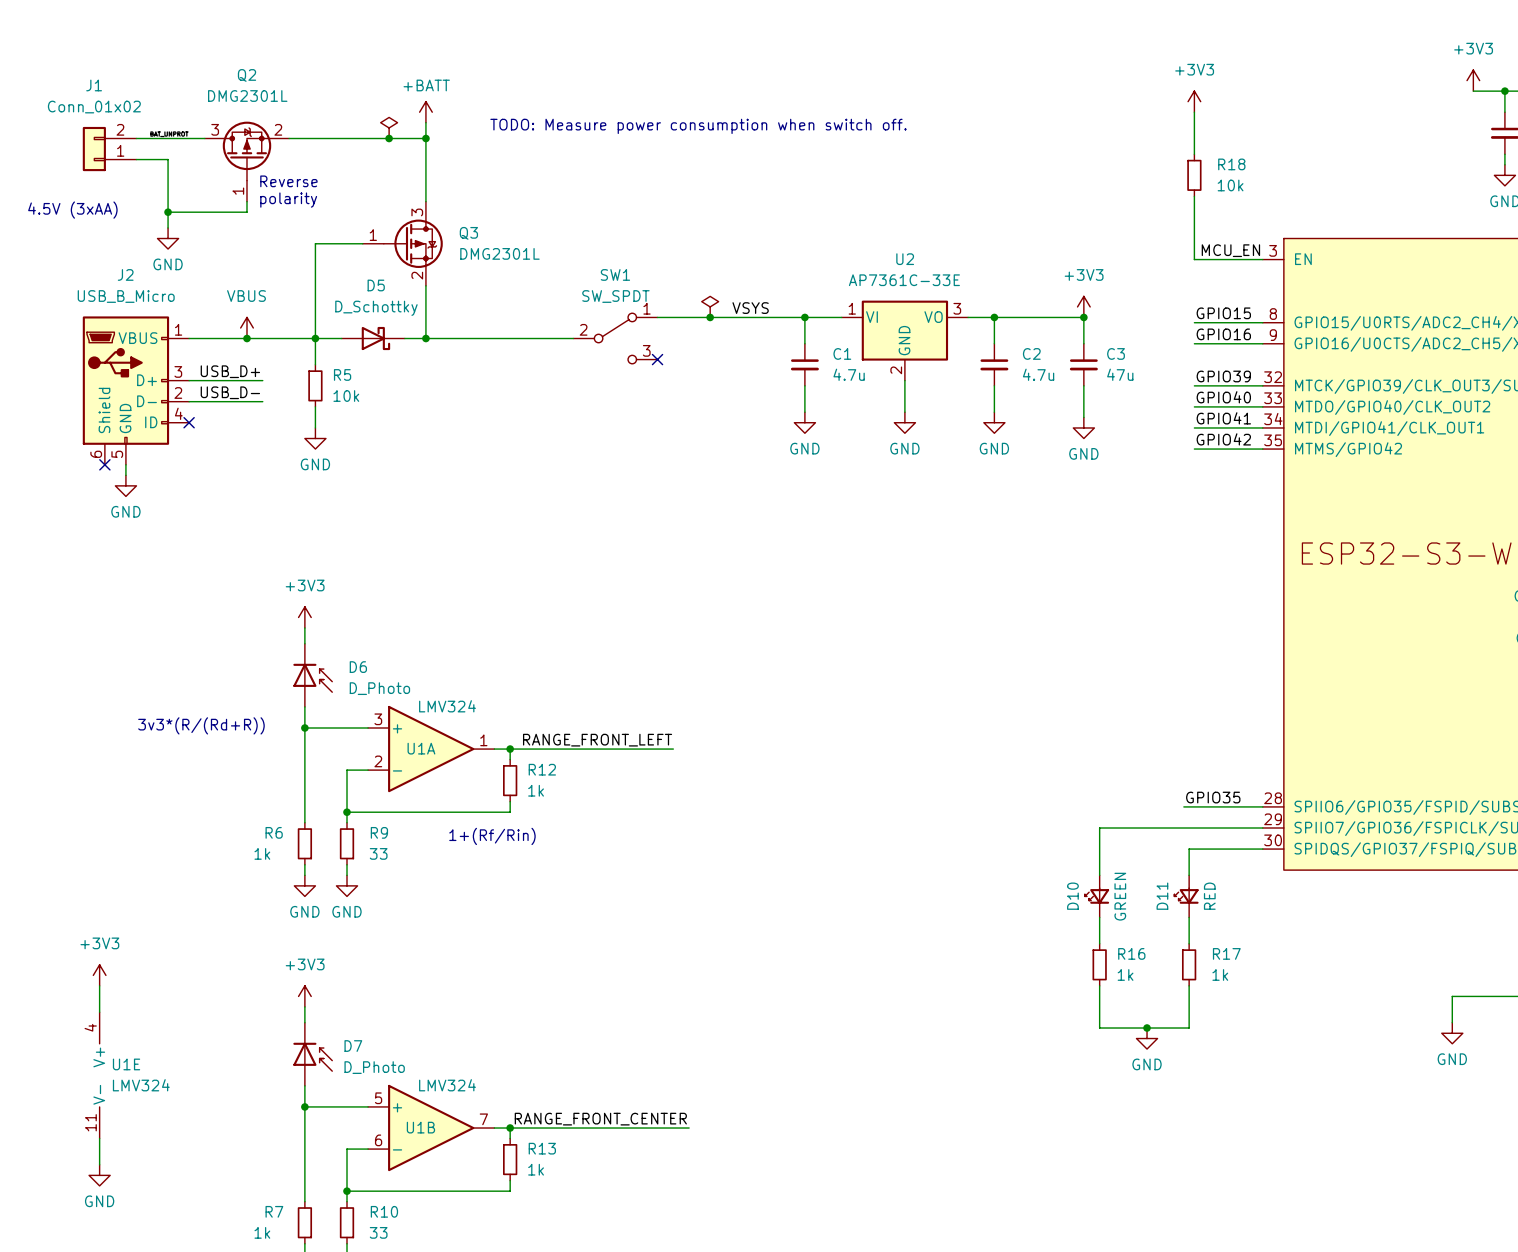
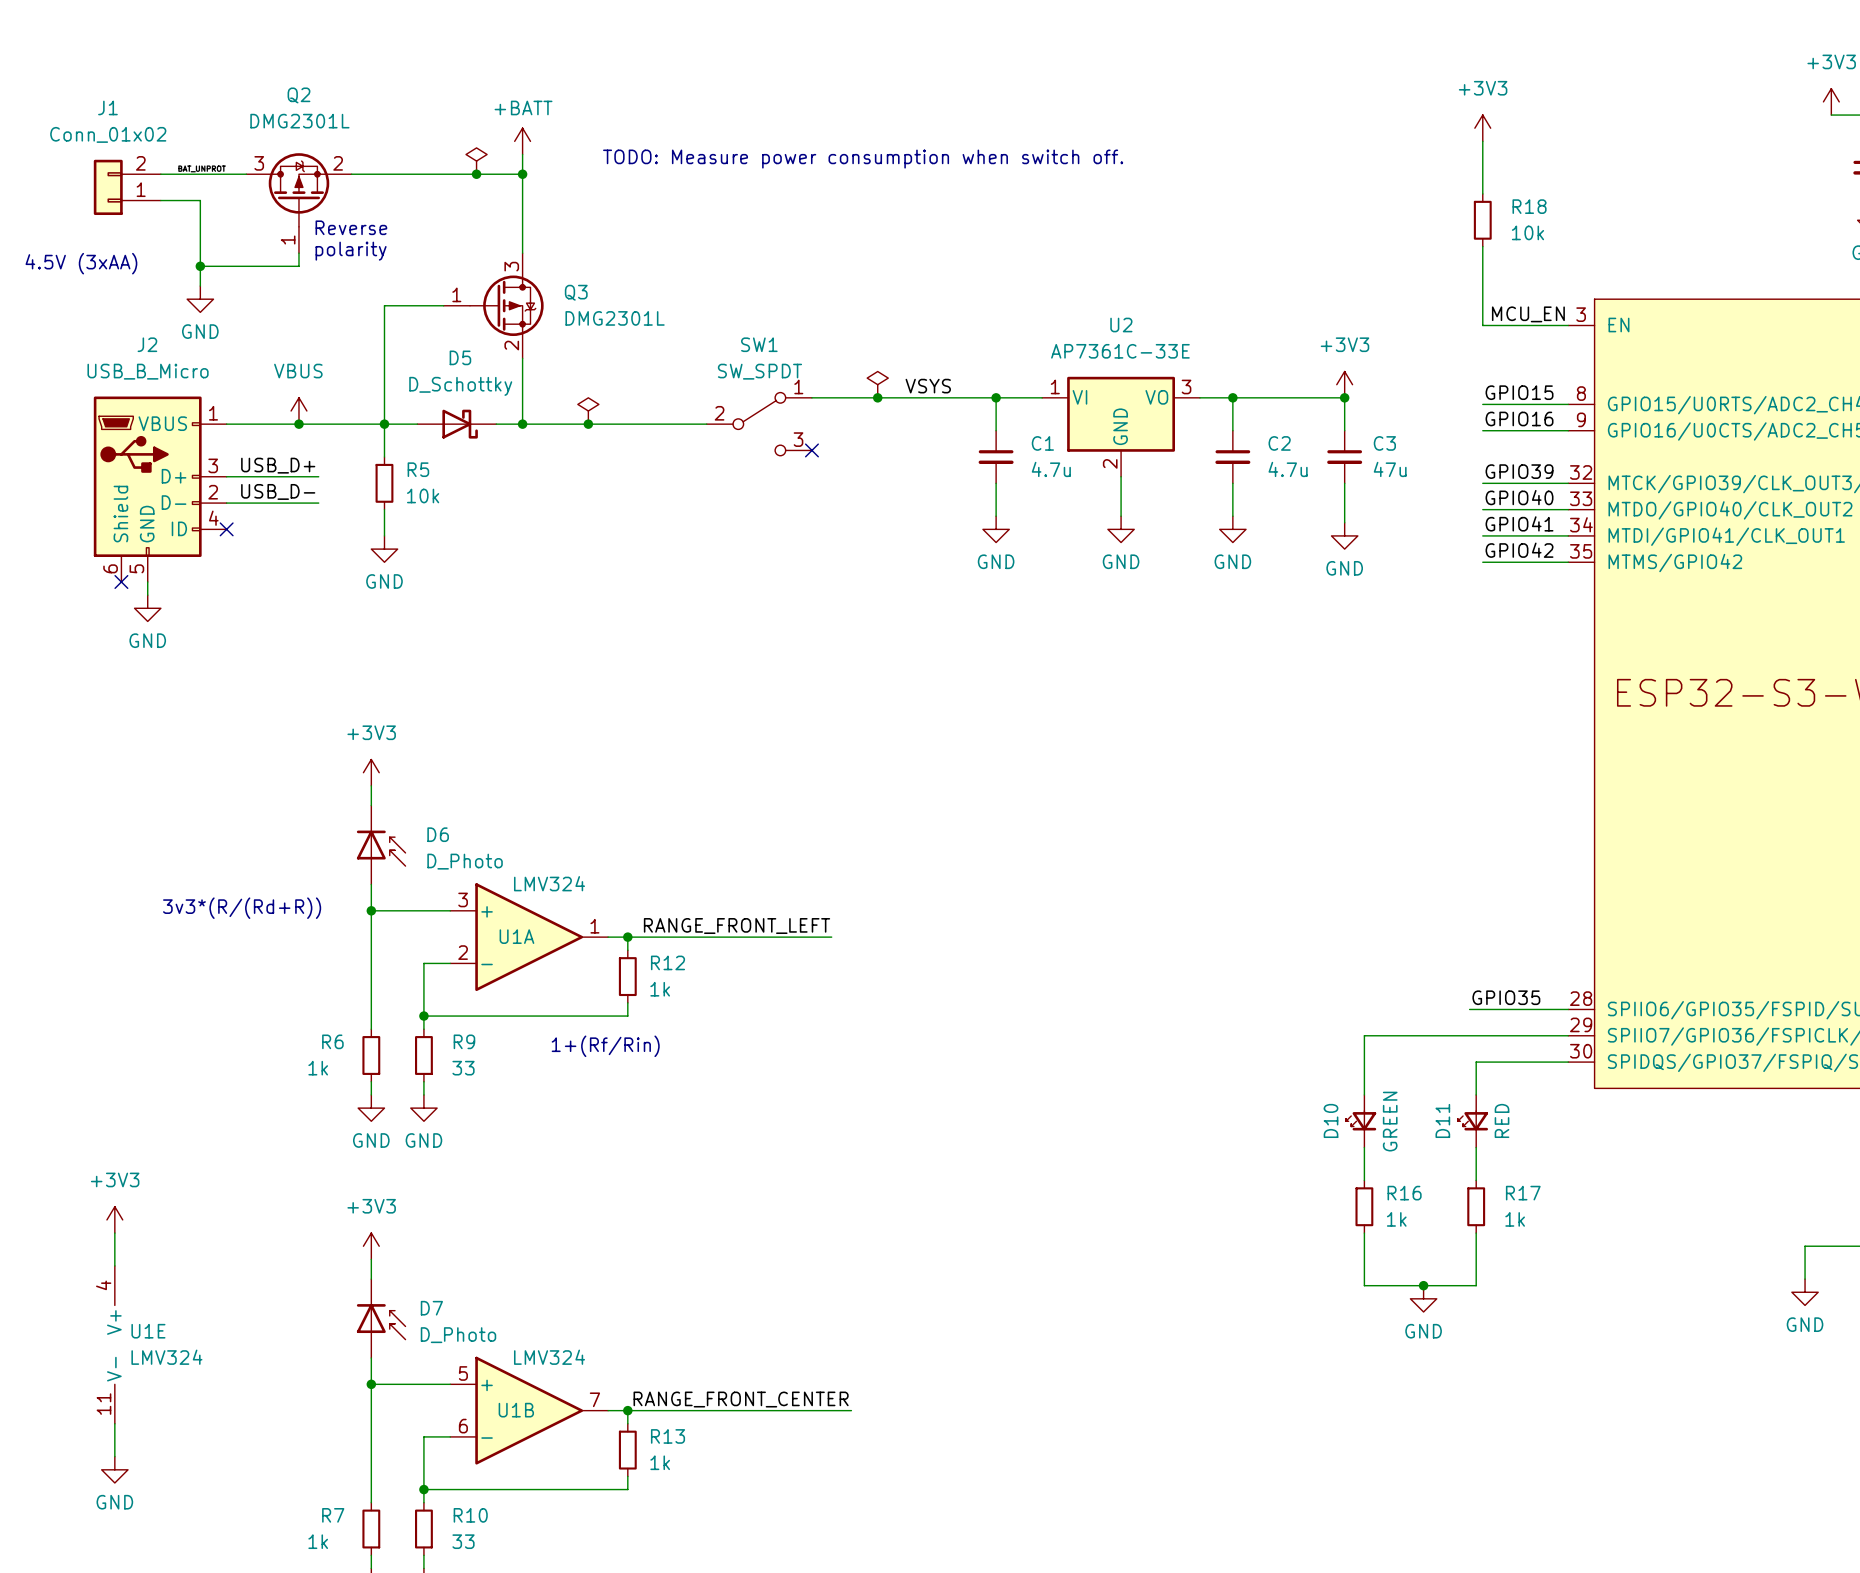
power symbol: none -> (588, 410)
junction: none -> (588, 424)

